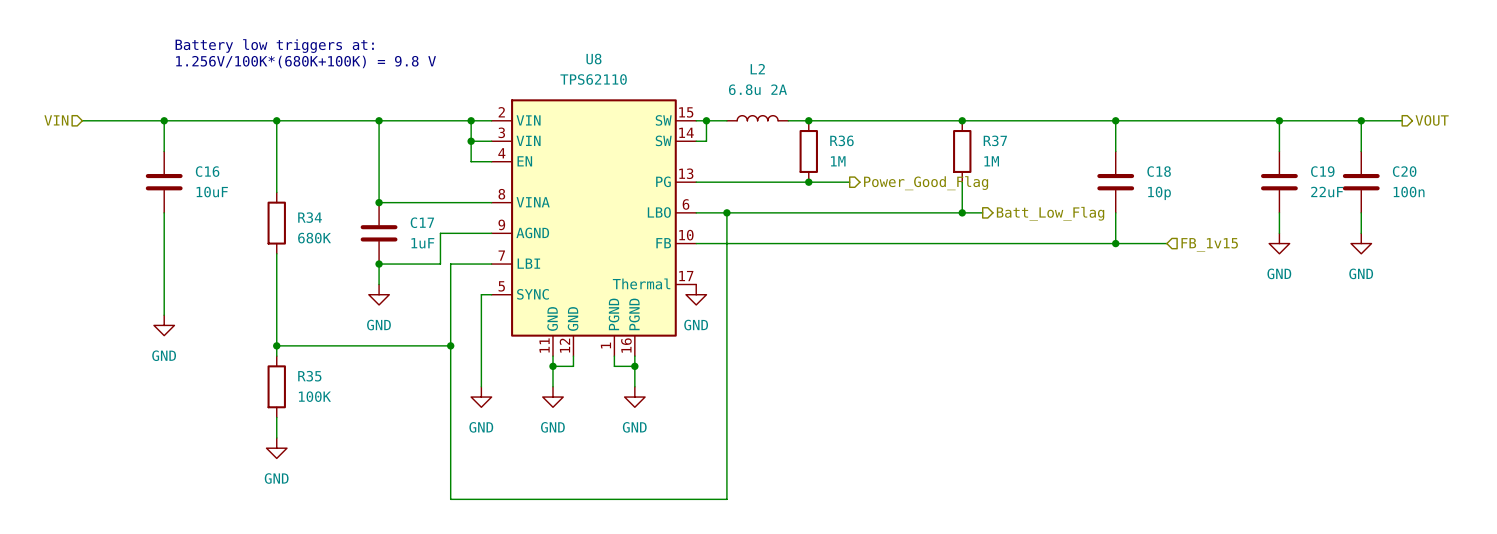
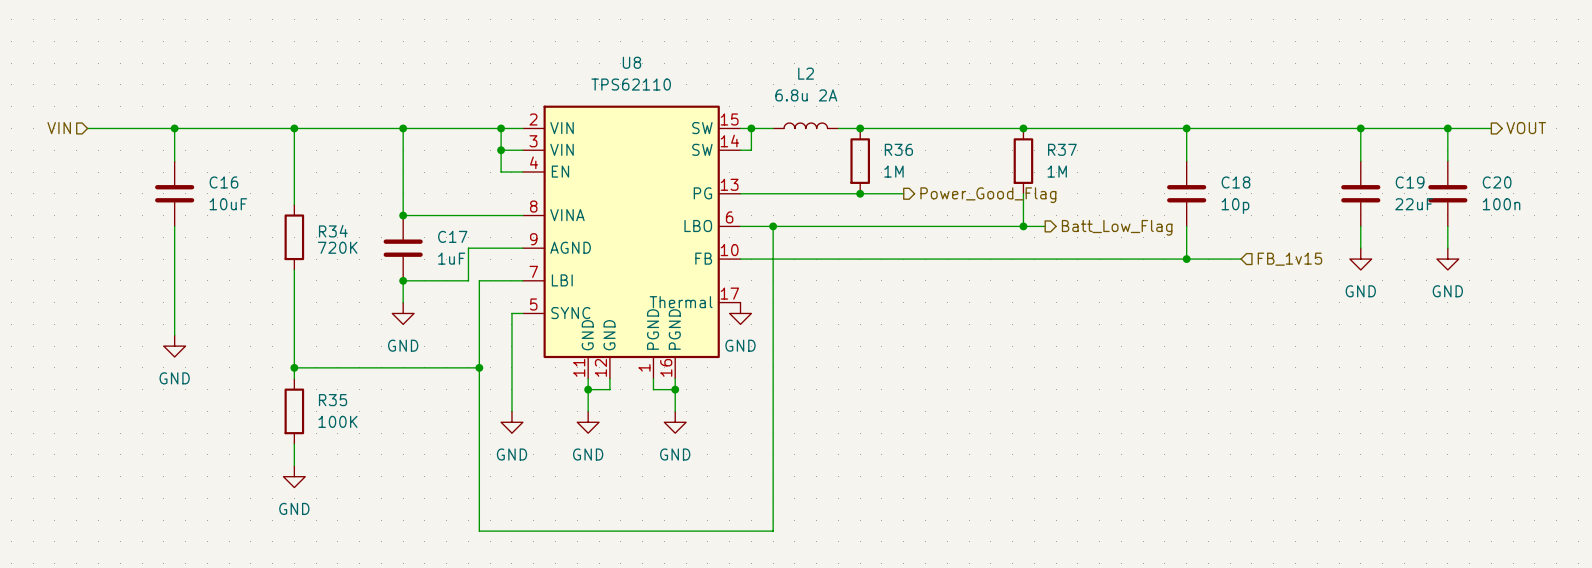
text: Battery low triggers at: (274, 46) -> none
text: 1.256V/100K*(680K+100K) = 9.8 V (306, 61) -> none
R34 value: 680K (314, 238) -> 720K (337, 247)

